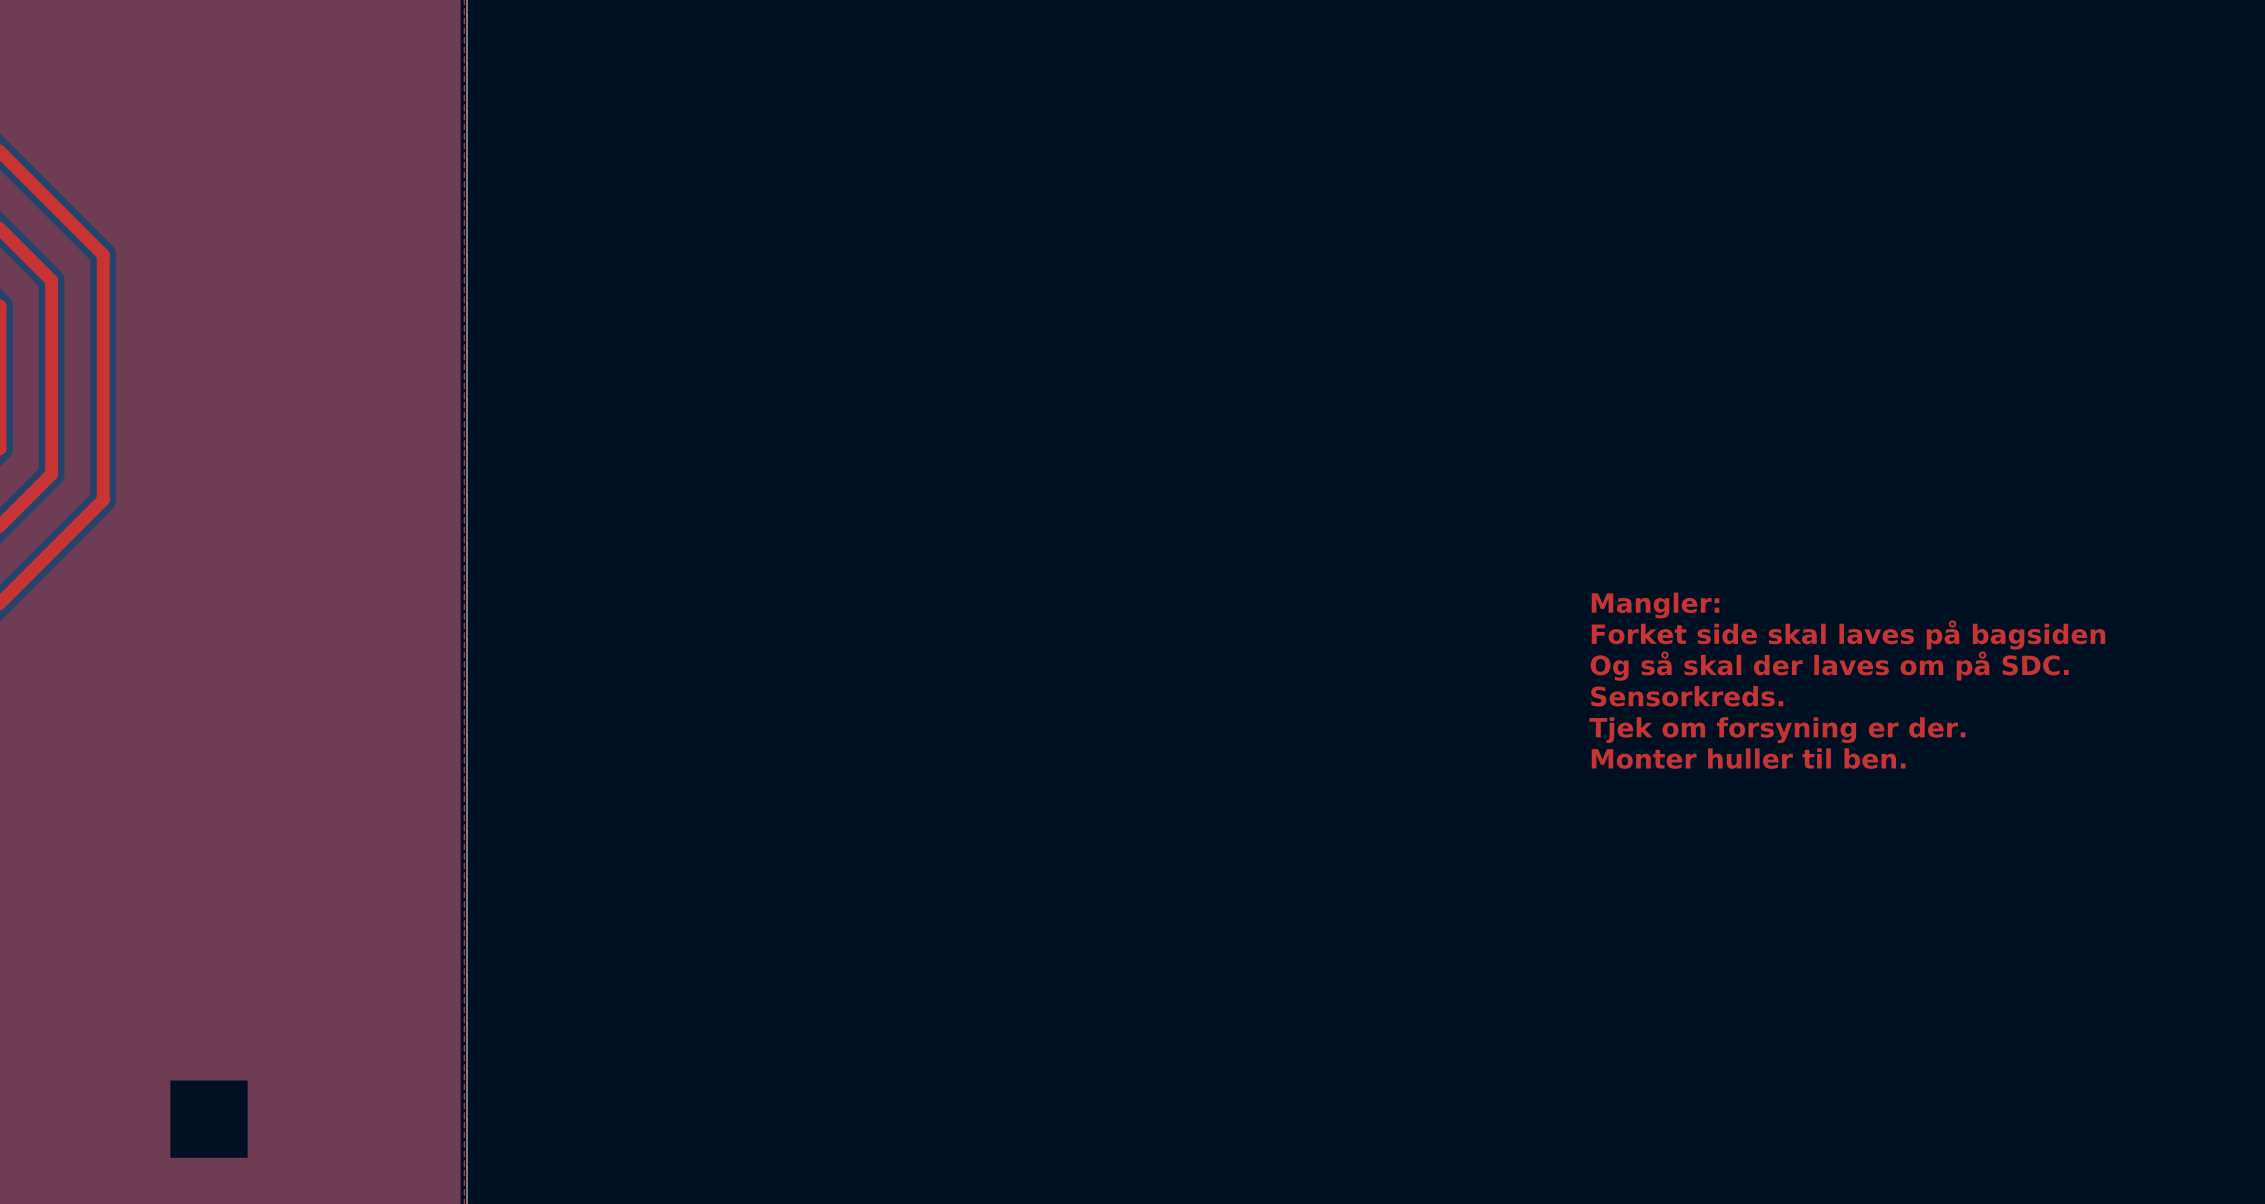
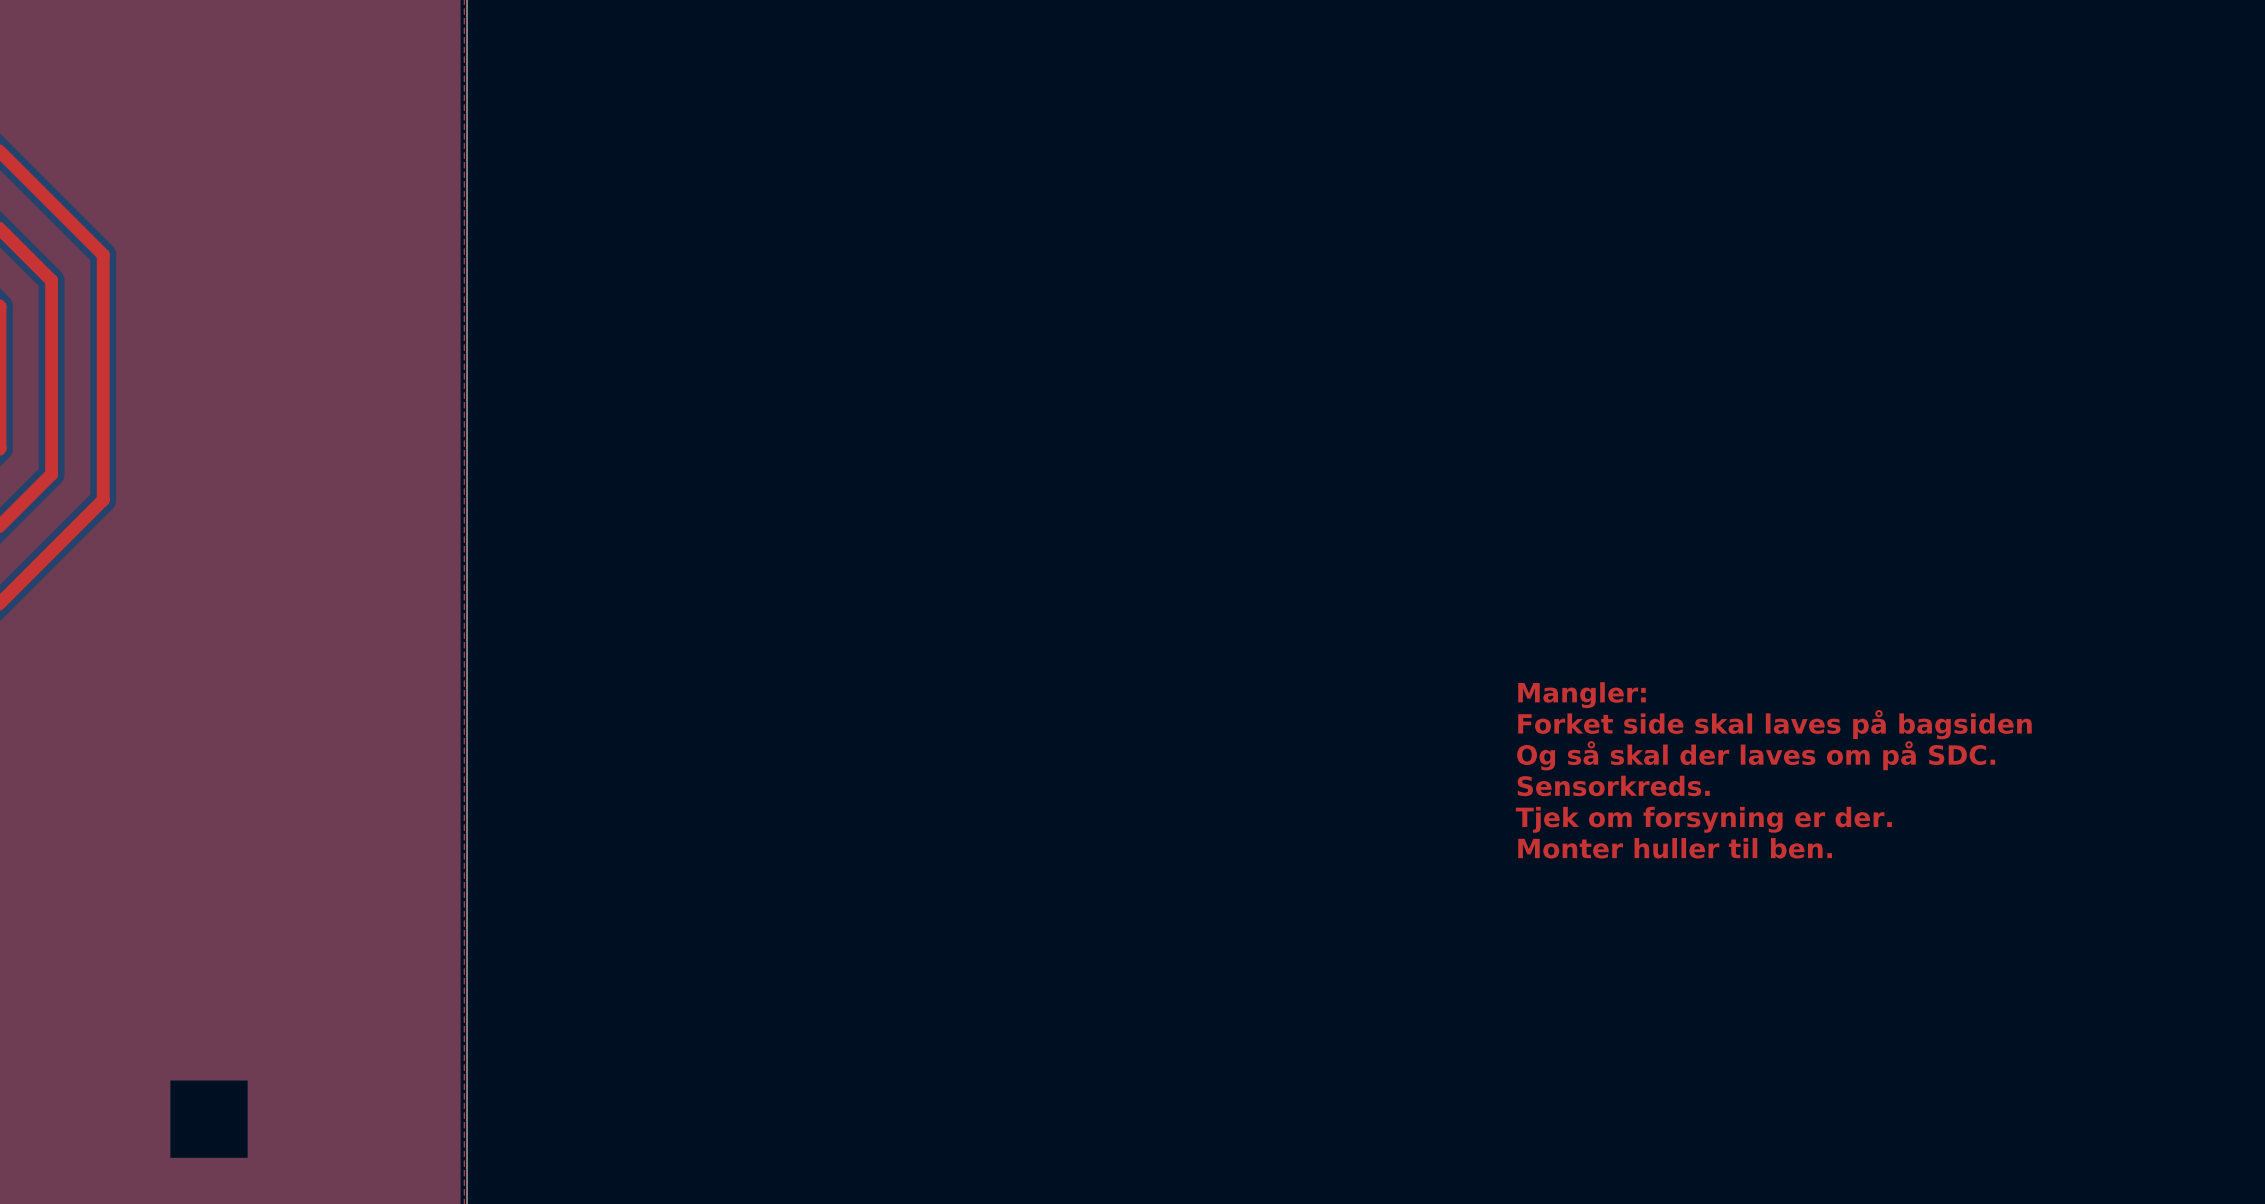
text position: Mangler: (1655, 605) -> Mangler: (1581, 695)
text position: Forket side skal laves på bagsiden (1848, 634) -> Forket side skal laves på bagsiden (1774, 724)
text position: Og så skal der laves om på SDC. (1829, 666) -> Og så skal der laves om på SDC. (1756, 755)
text position: Sensorkreds. (1687, 696) -> Sensorkreds. (1613, 785)
text position: Tjek om forsyning er der. (1777, 730) -> Tjek om forsyning er der. (1703, 819)
text position: Monter huller til ben. (1748, 758) -> Monter huller til ben. (1675, 848)

